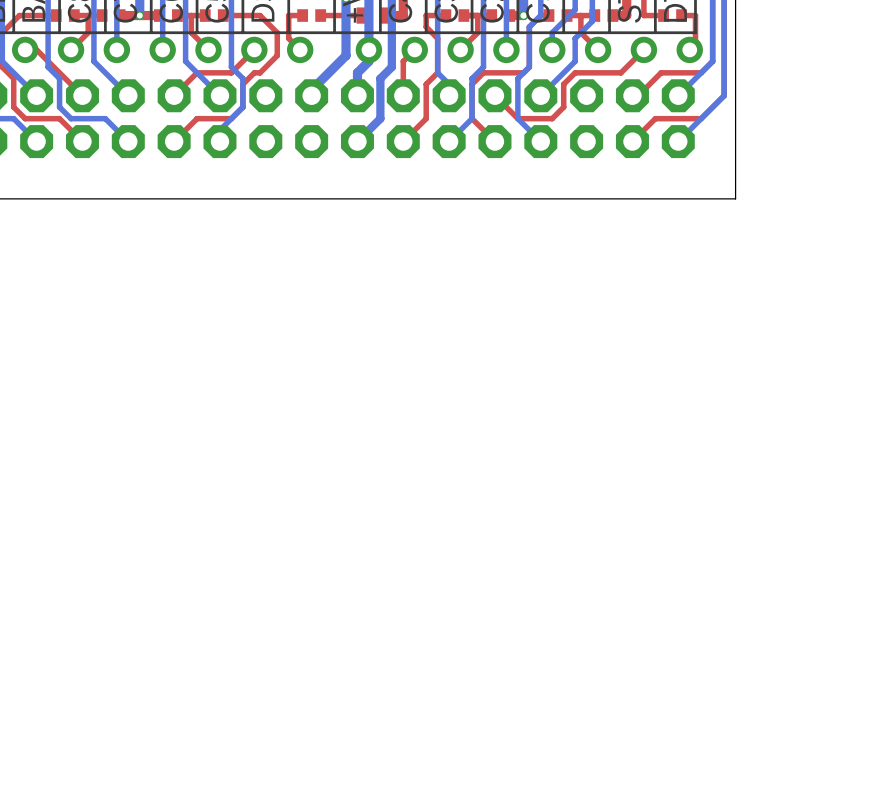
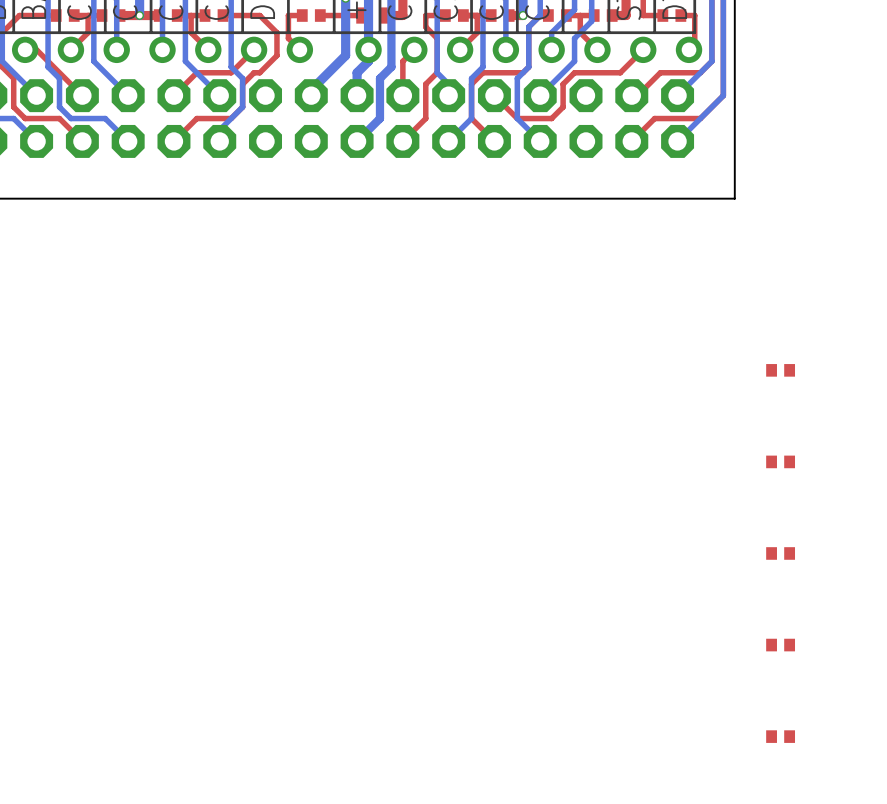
part: none -> (780, 370)
part: none -> (780, 461)
part: none -> (780, 553)
part: none -> (780, 645)
part: none -> (780, 736)

